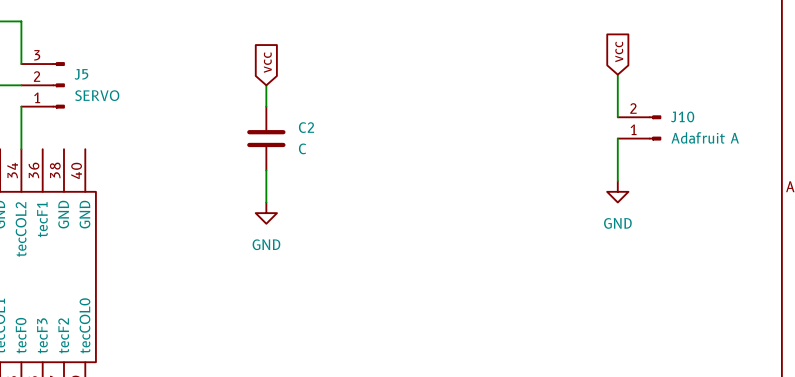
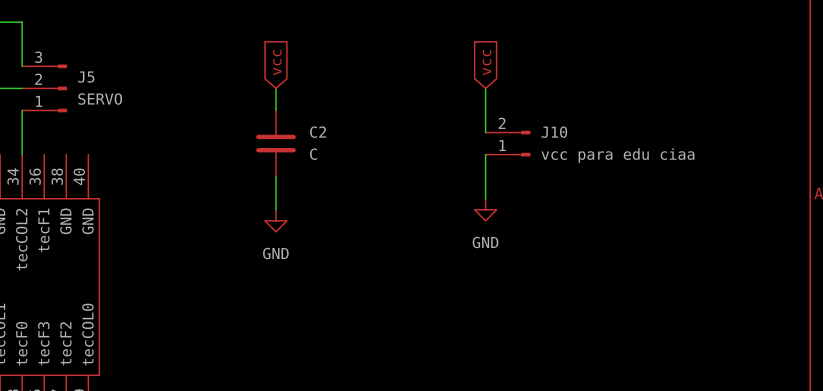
global label position: vcc (619, 51) -> vcc (487, 62)
wire: (617, 74) (617, 117) -> (485, 88) (485, 132)
J10 position: (639, 127) -> (508, 143)
J10 value: Adafruit A (705, 137) -> vcc para edu ciaa (617, 155)
wire: (617, 138) (617, 181) -> (485, 154) (485, 198)
power symbol position: GND (617, 191) -> GND (485, 209)

